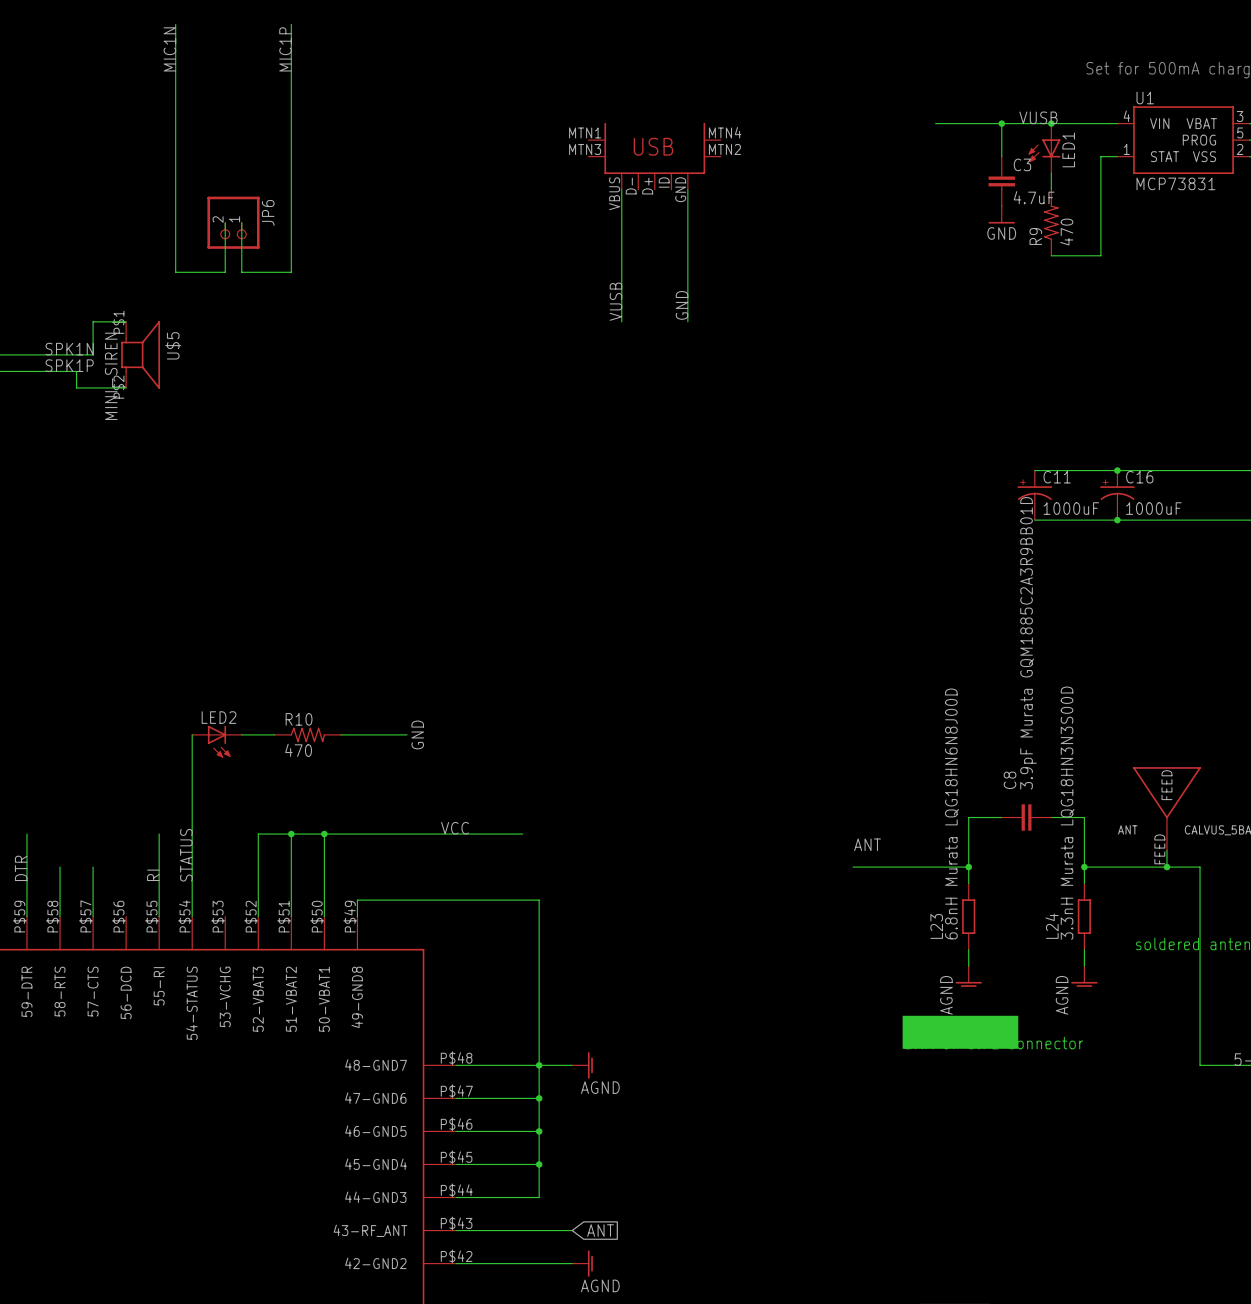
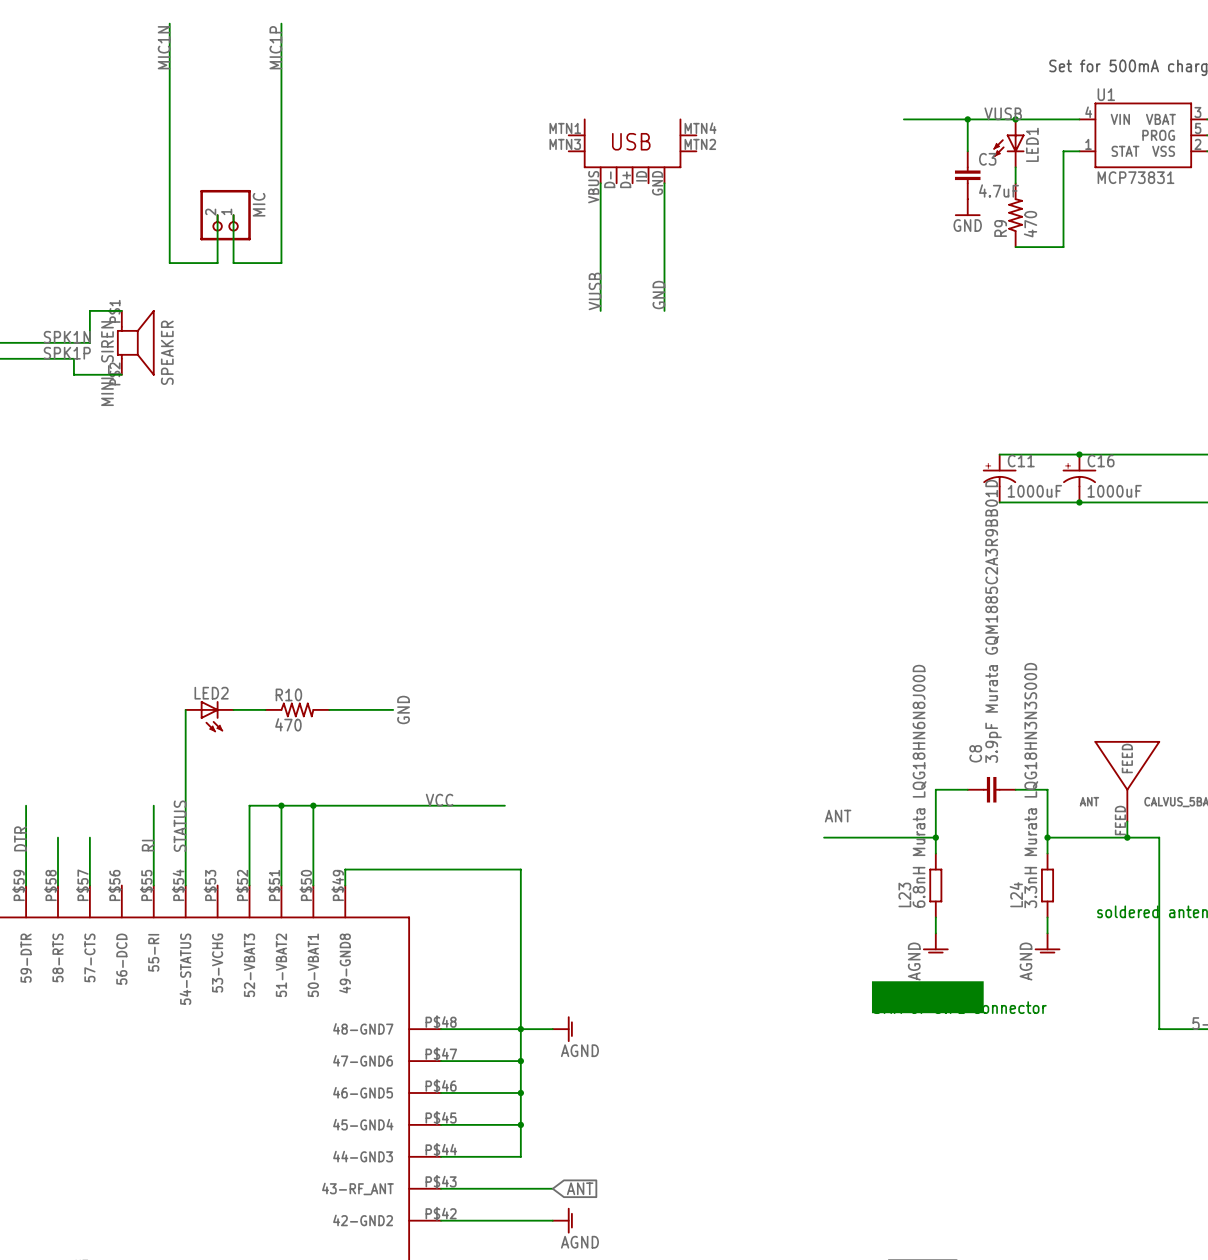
JP6 name: JP6 (268, 212) -> MIC (259, 204)
U$5 name: U$5 (173, 345) -> SPEAKER (167, 352)

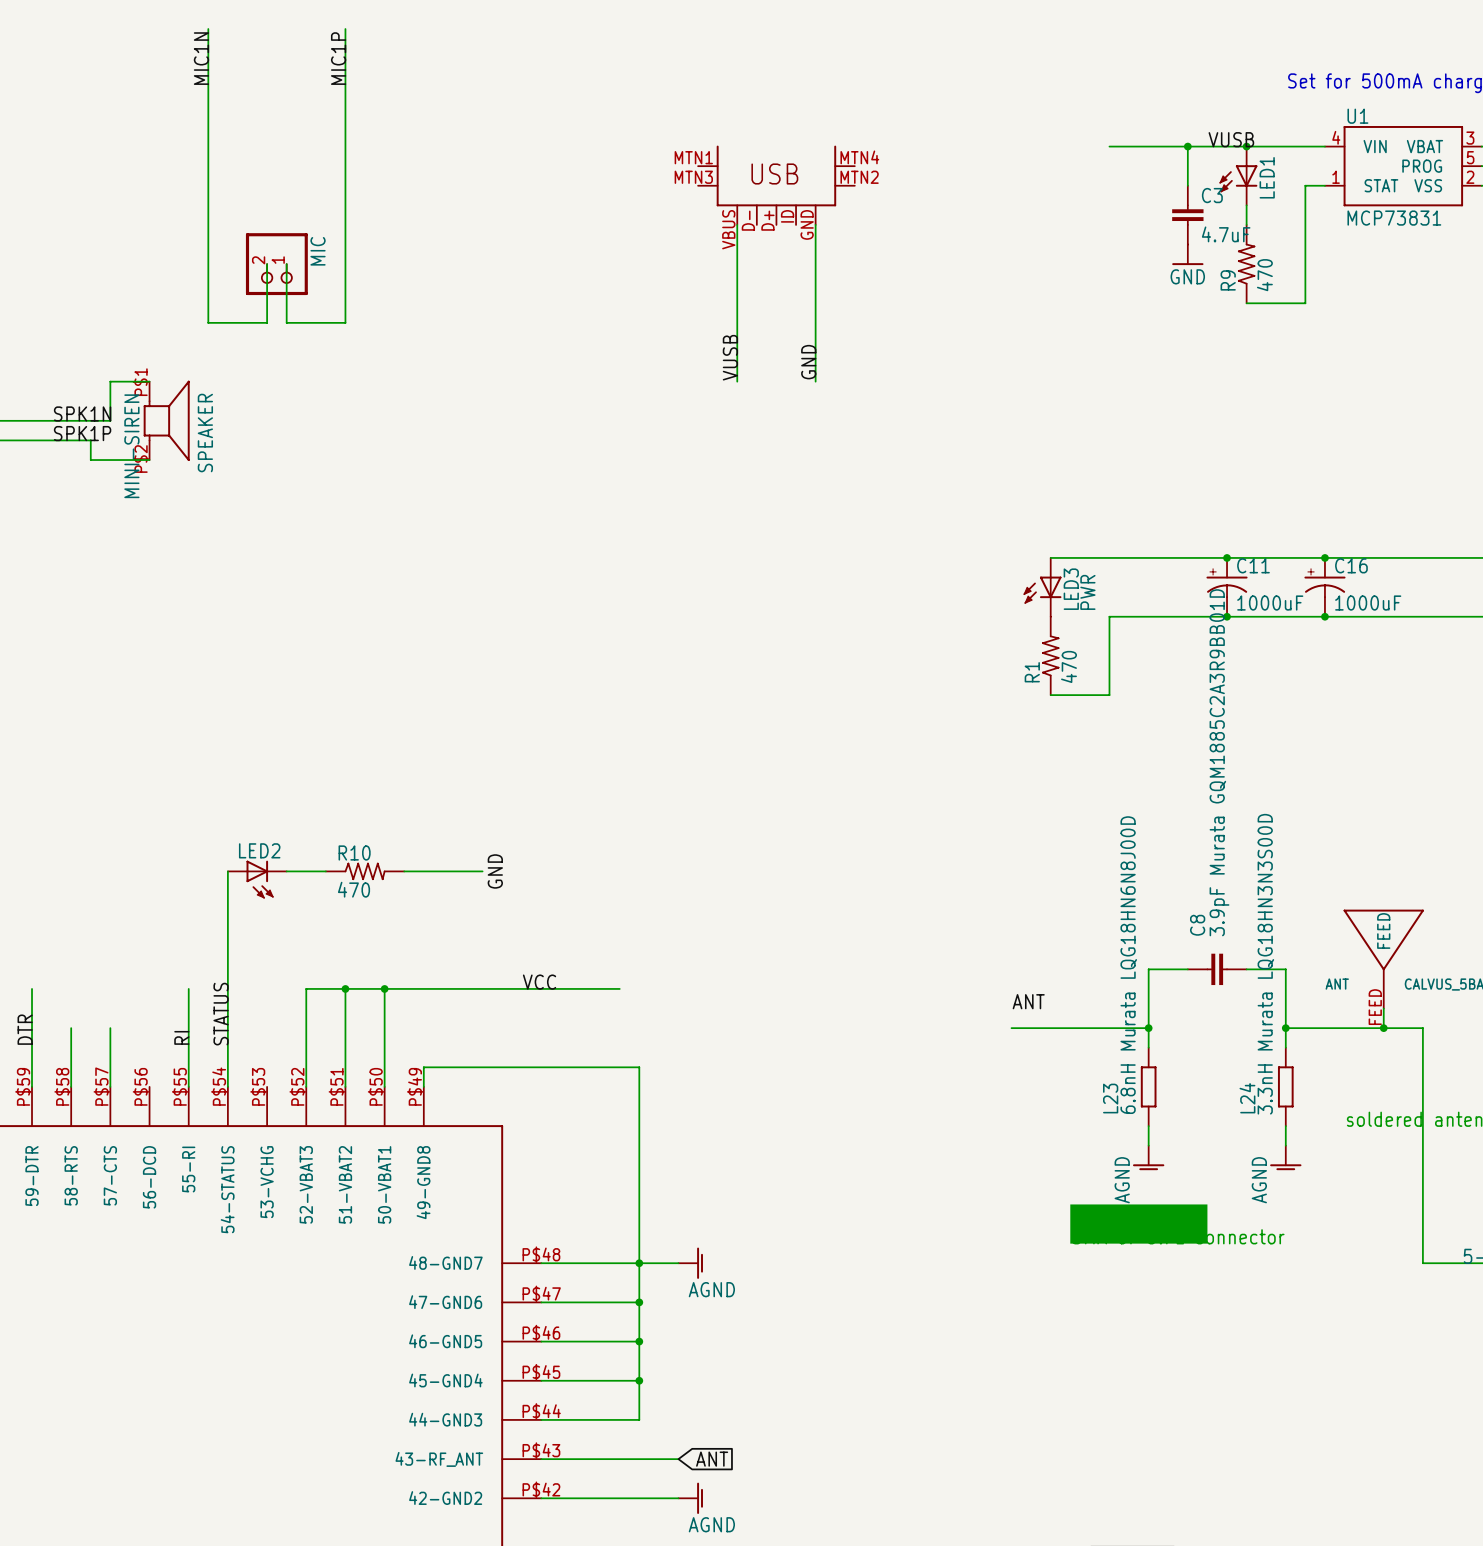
wire: none -> (1050, 557) (1227, 557)
junction: none -> (1227, 557)
LED3: none -> PWR (1042, 587)
wire: none -> (1227, 616) (1109, 616) (1109, 695) (1050, 695)
junction: none -> (1227, 616)
R1: none -> 470 (1050, 655)

